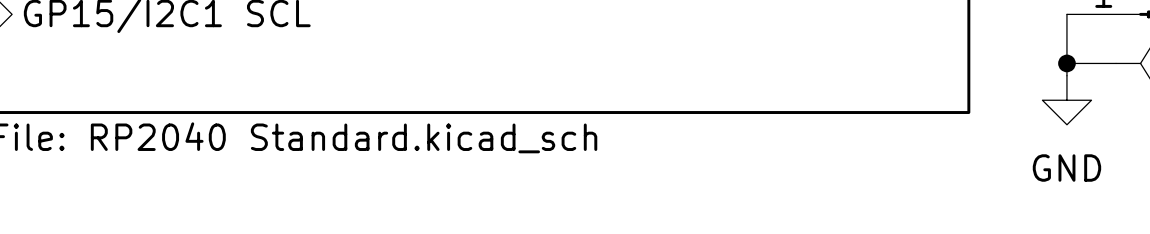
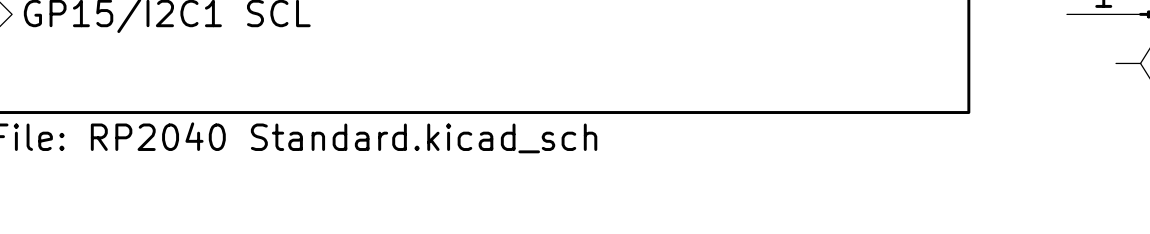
wire: (1066, 14) (1066, 75) -> none
wire: (1066, 63) (1116, 63) -> none
junction: (1066, 63) -> none
power symbol: GND (1066, 100) -> none

